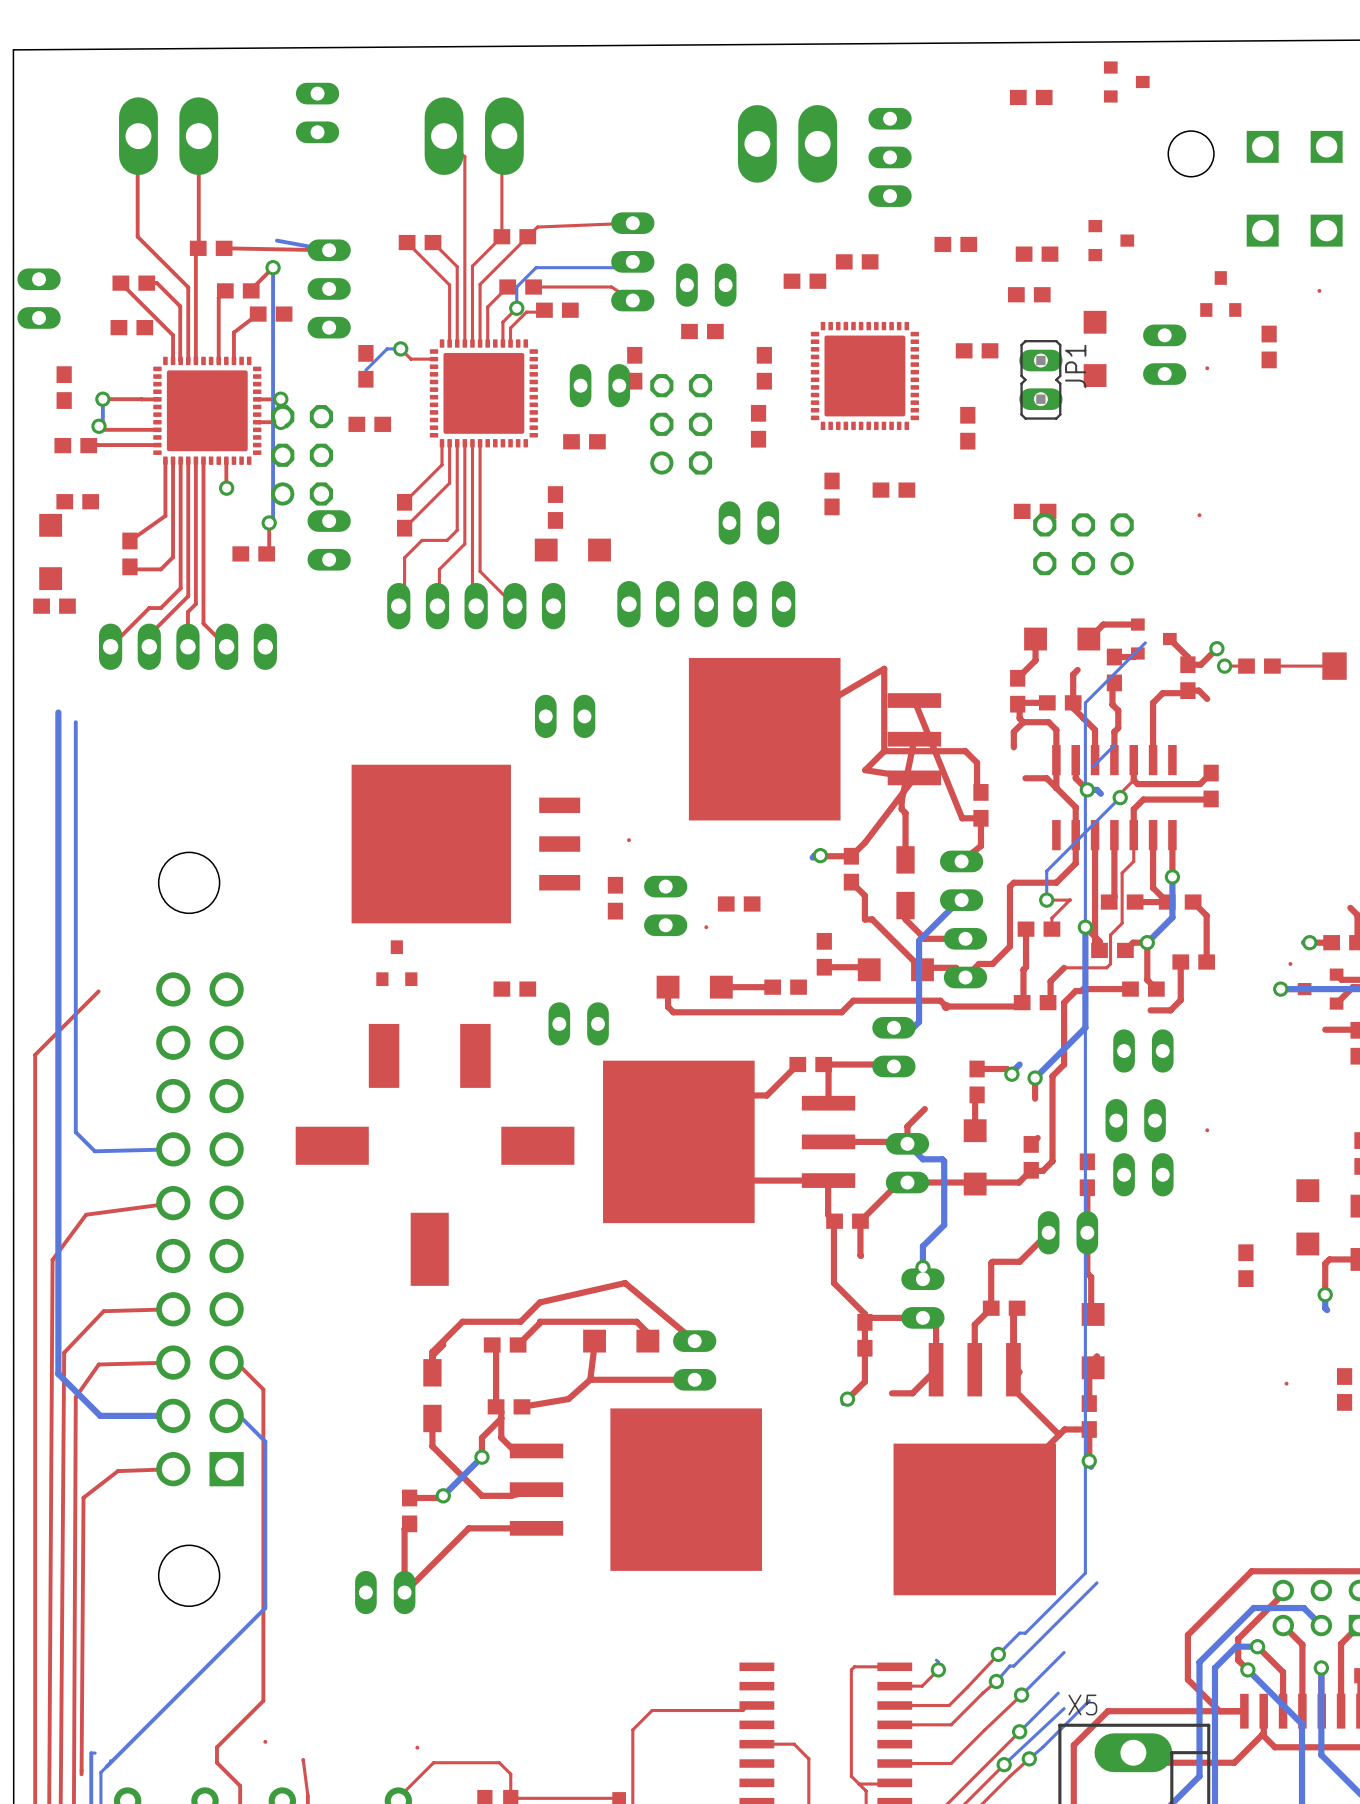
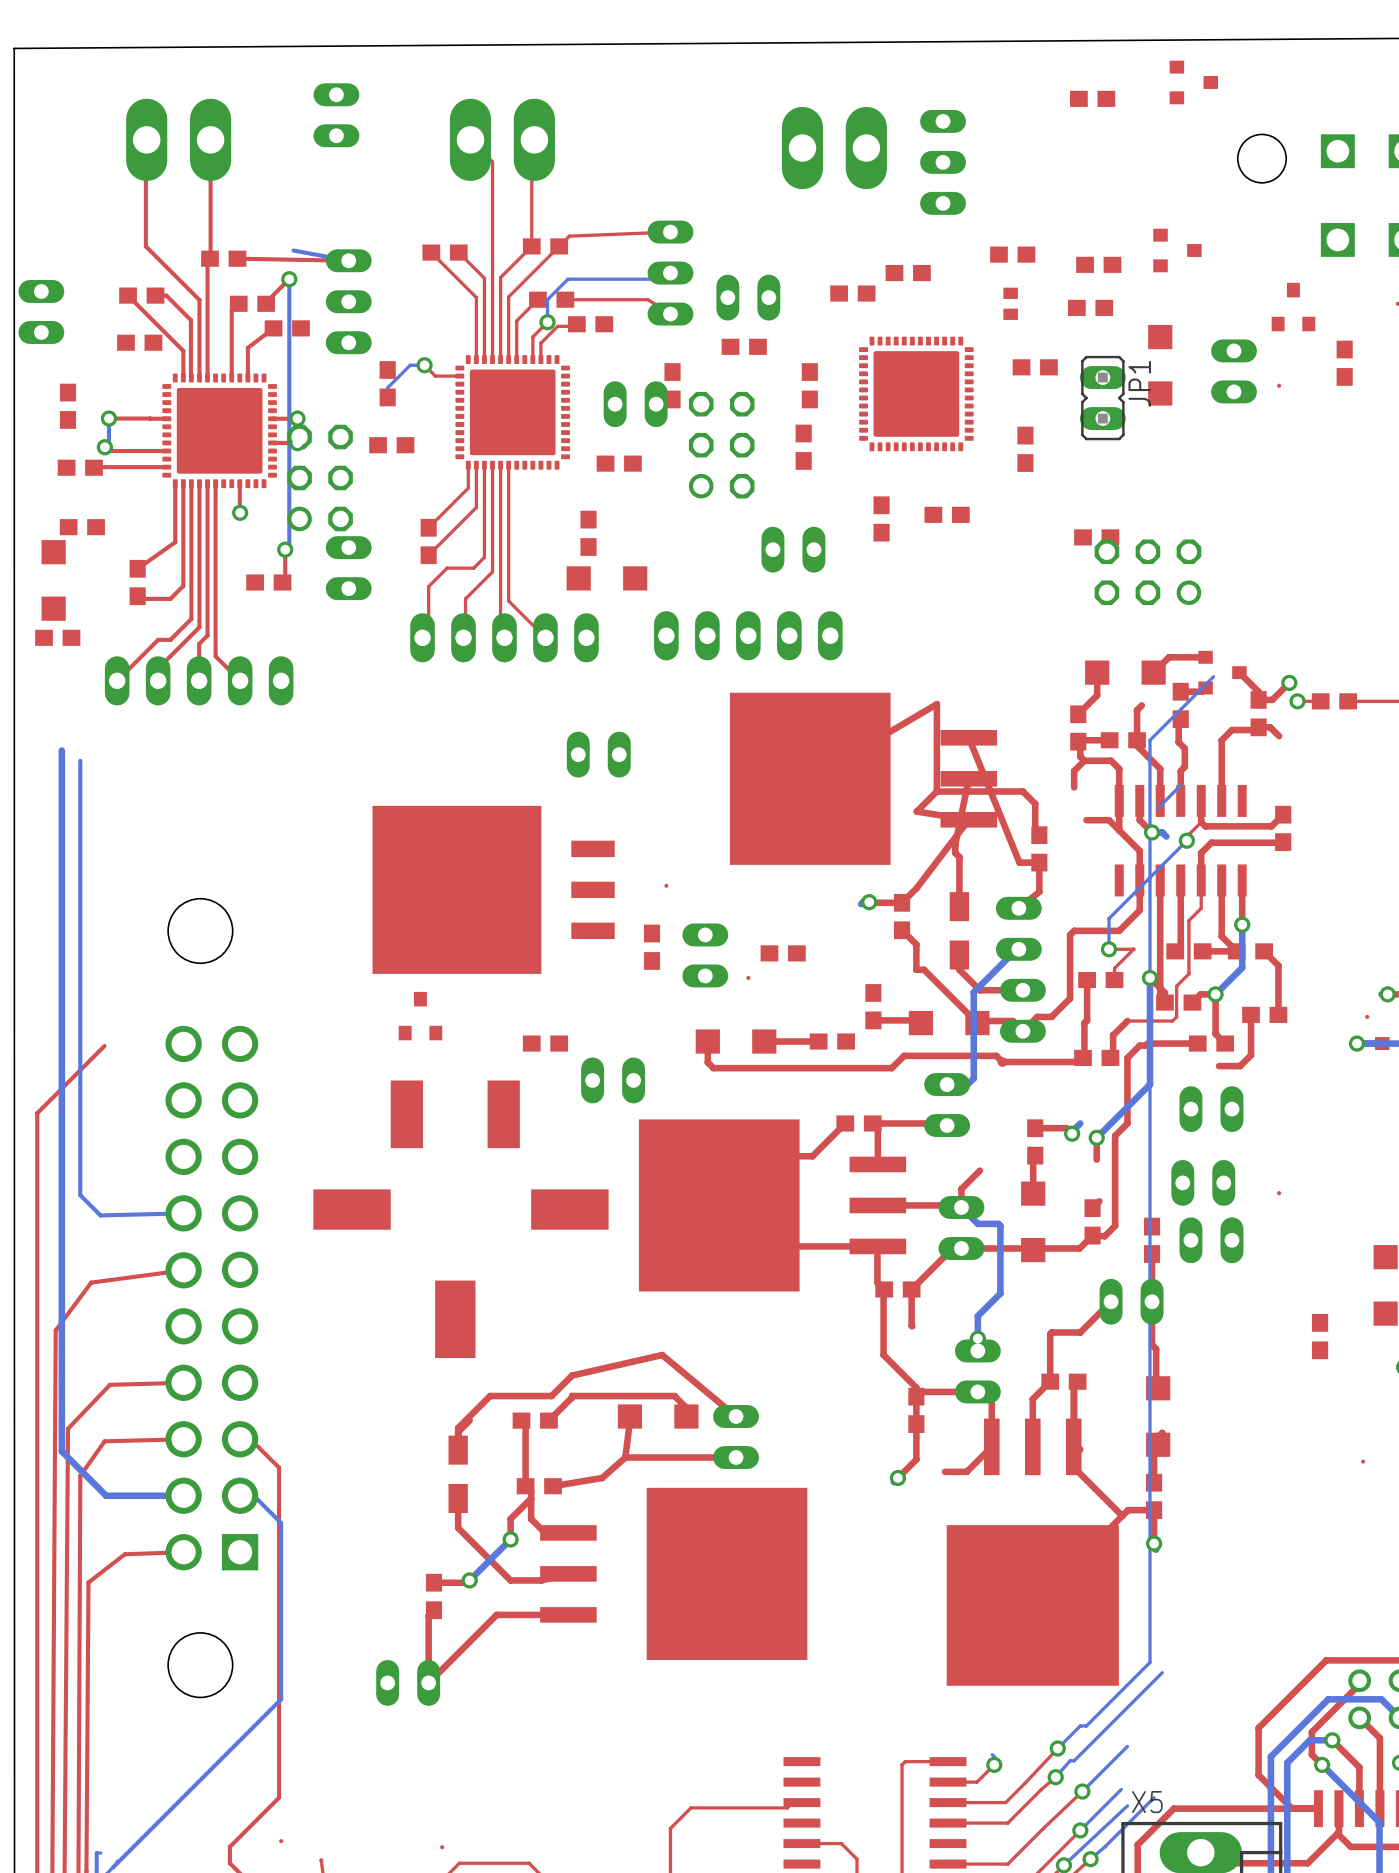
part: none -> (1010, 303)
part: (1199, 515) -> none

